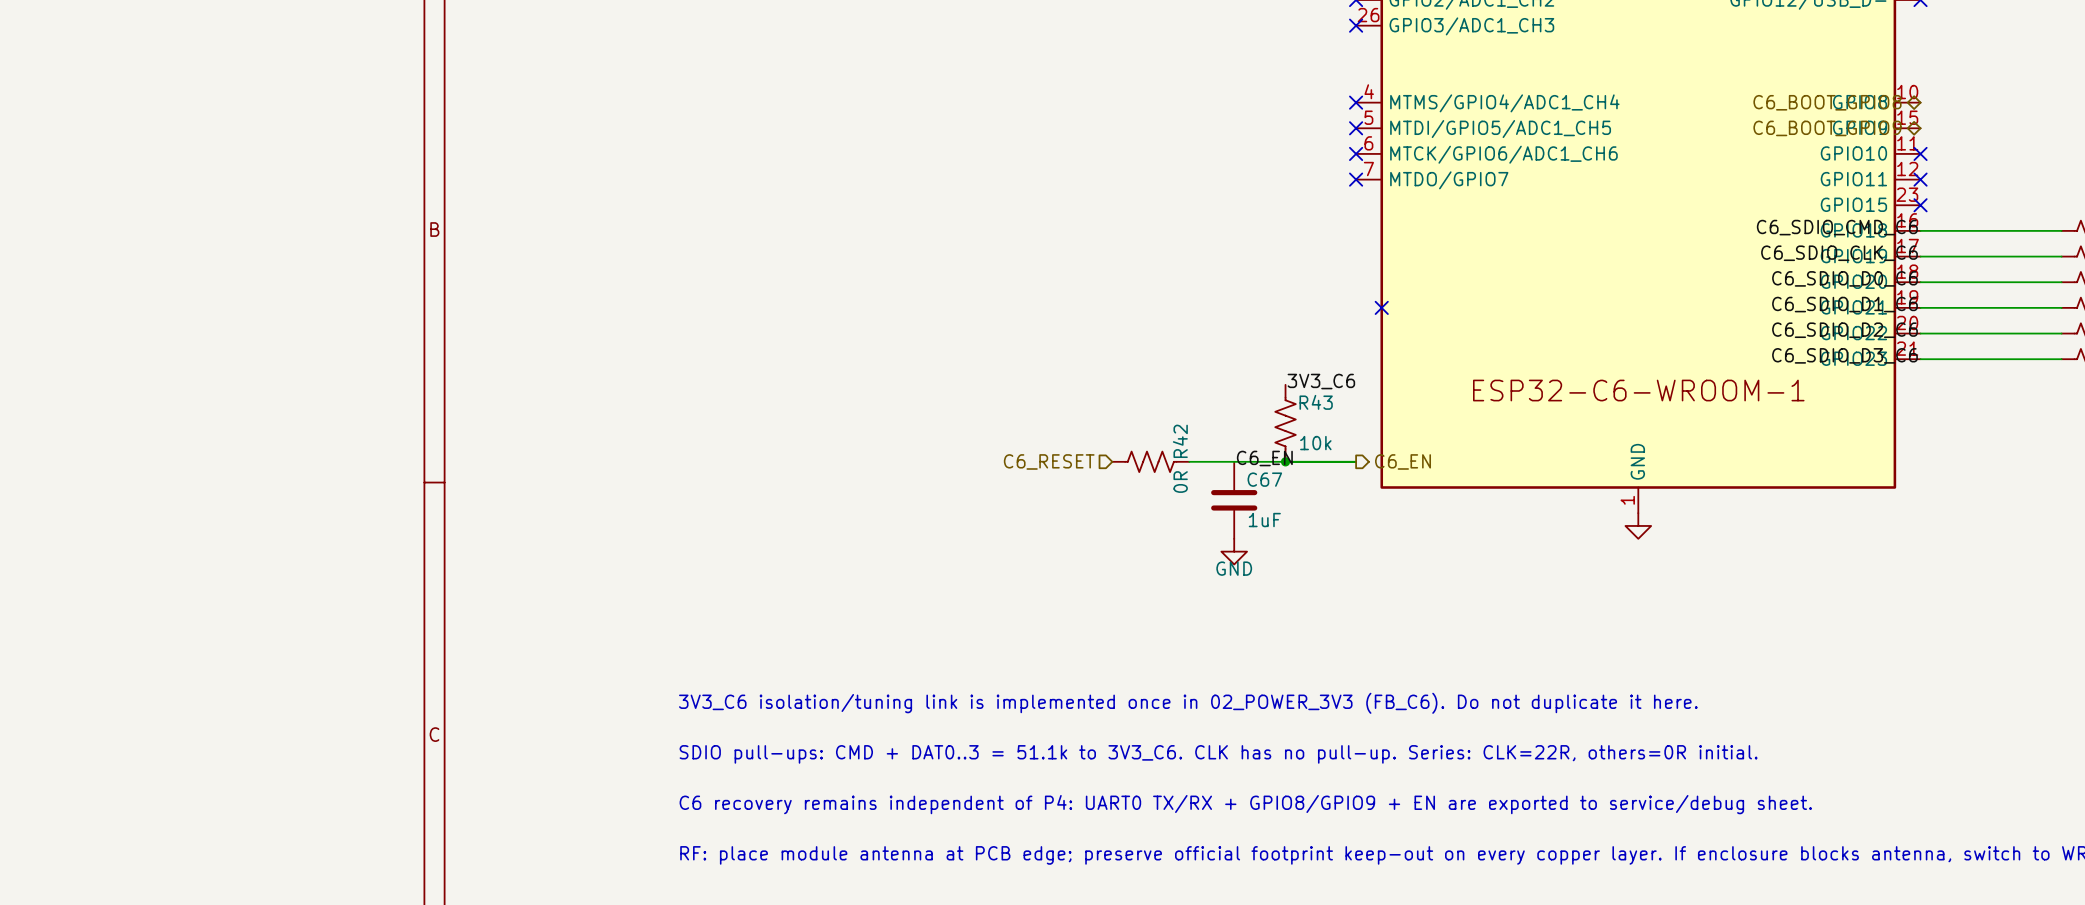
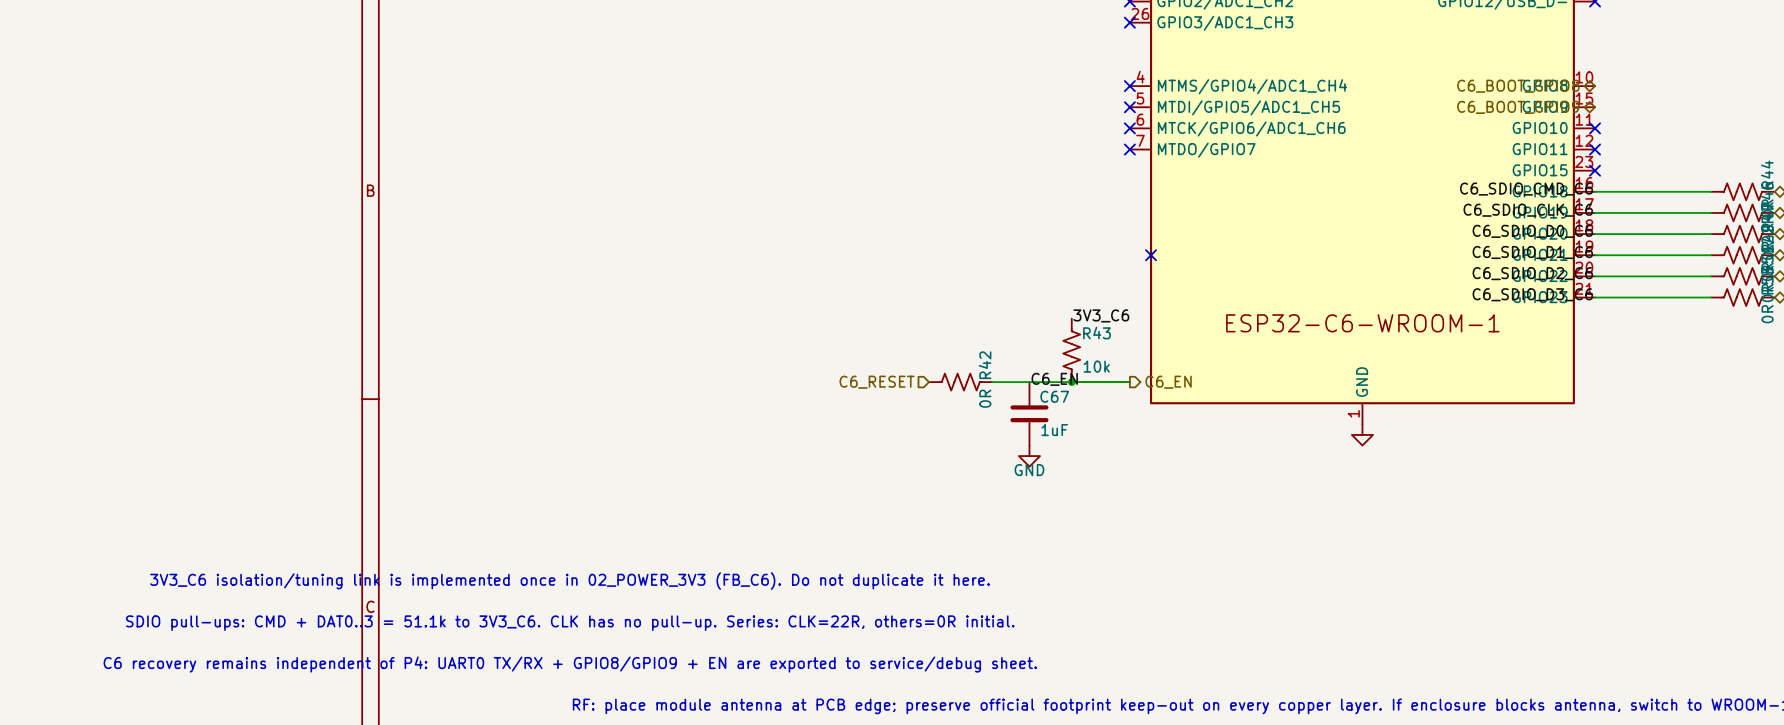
text position: 3V3_C6 isolation/tuning link is implemented once in 02_POWER_3V3 (FB_C6). Do not duplicate it here. (1188, 703) -> 3V3_C6 isolation/tuning link is implemented once in 02_POWER_3V3 (FB_C6). Do not duplicate it here. (570, 581)
text position: SDIO pull-ups: CMD + DAT0..3 = 51.1k to 3V3_C6. CLK has no pull-up. Series: CLK=22R, others=0R initial. (1218, 754) -> SDIO pull-ups: CMD + DAT0..3 = 51.1k to 3V3_C6. CLK has no pull-up. Series: CLK=22R, others=0R initial. (570, 623)
text position: C6 recovery remains independent of P4: UART0 TX/RX + GPIO8/GPIO9 + EN are exported to service/debug sheet. (1245, 804) -> C6 recovery remains independent of P4: UART0 TX/RX + GPIO8/GPIO9 + EN are exported to service/debug sheet. (570, 664)

